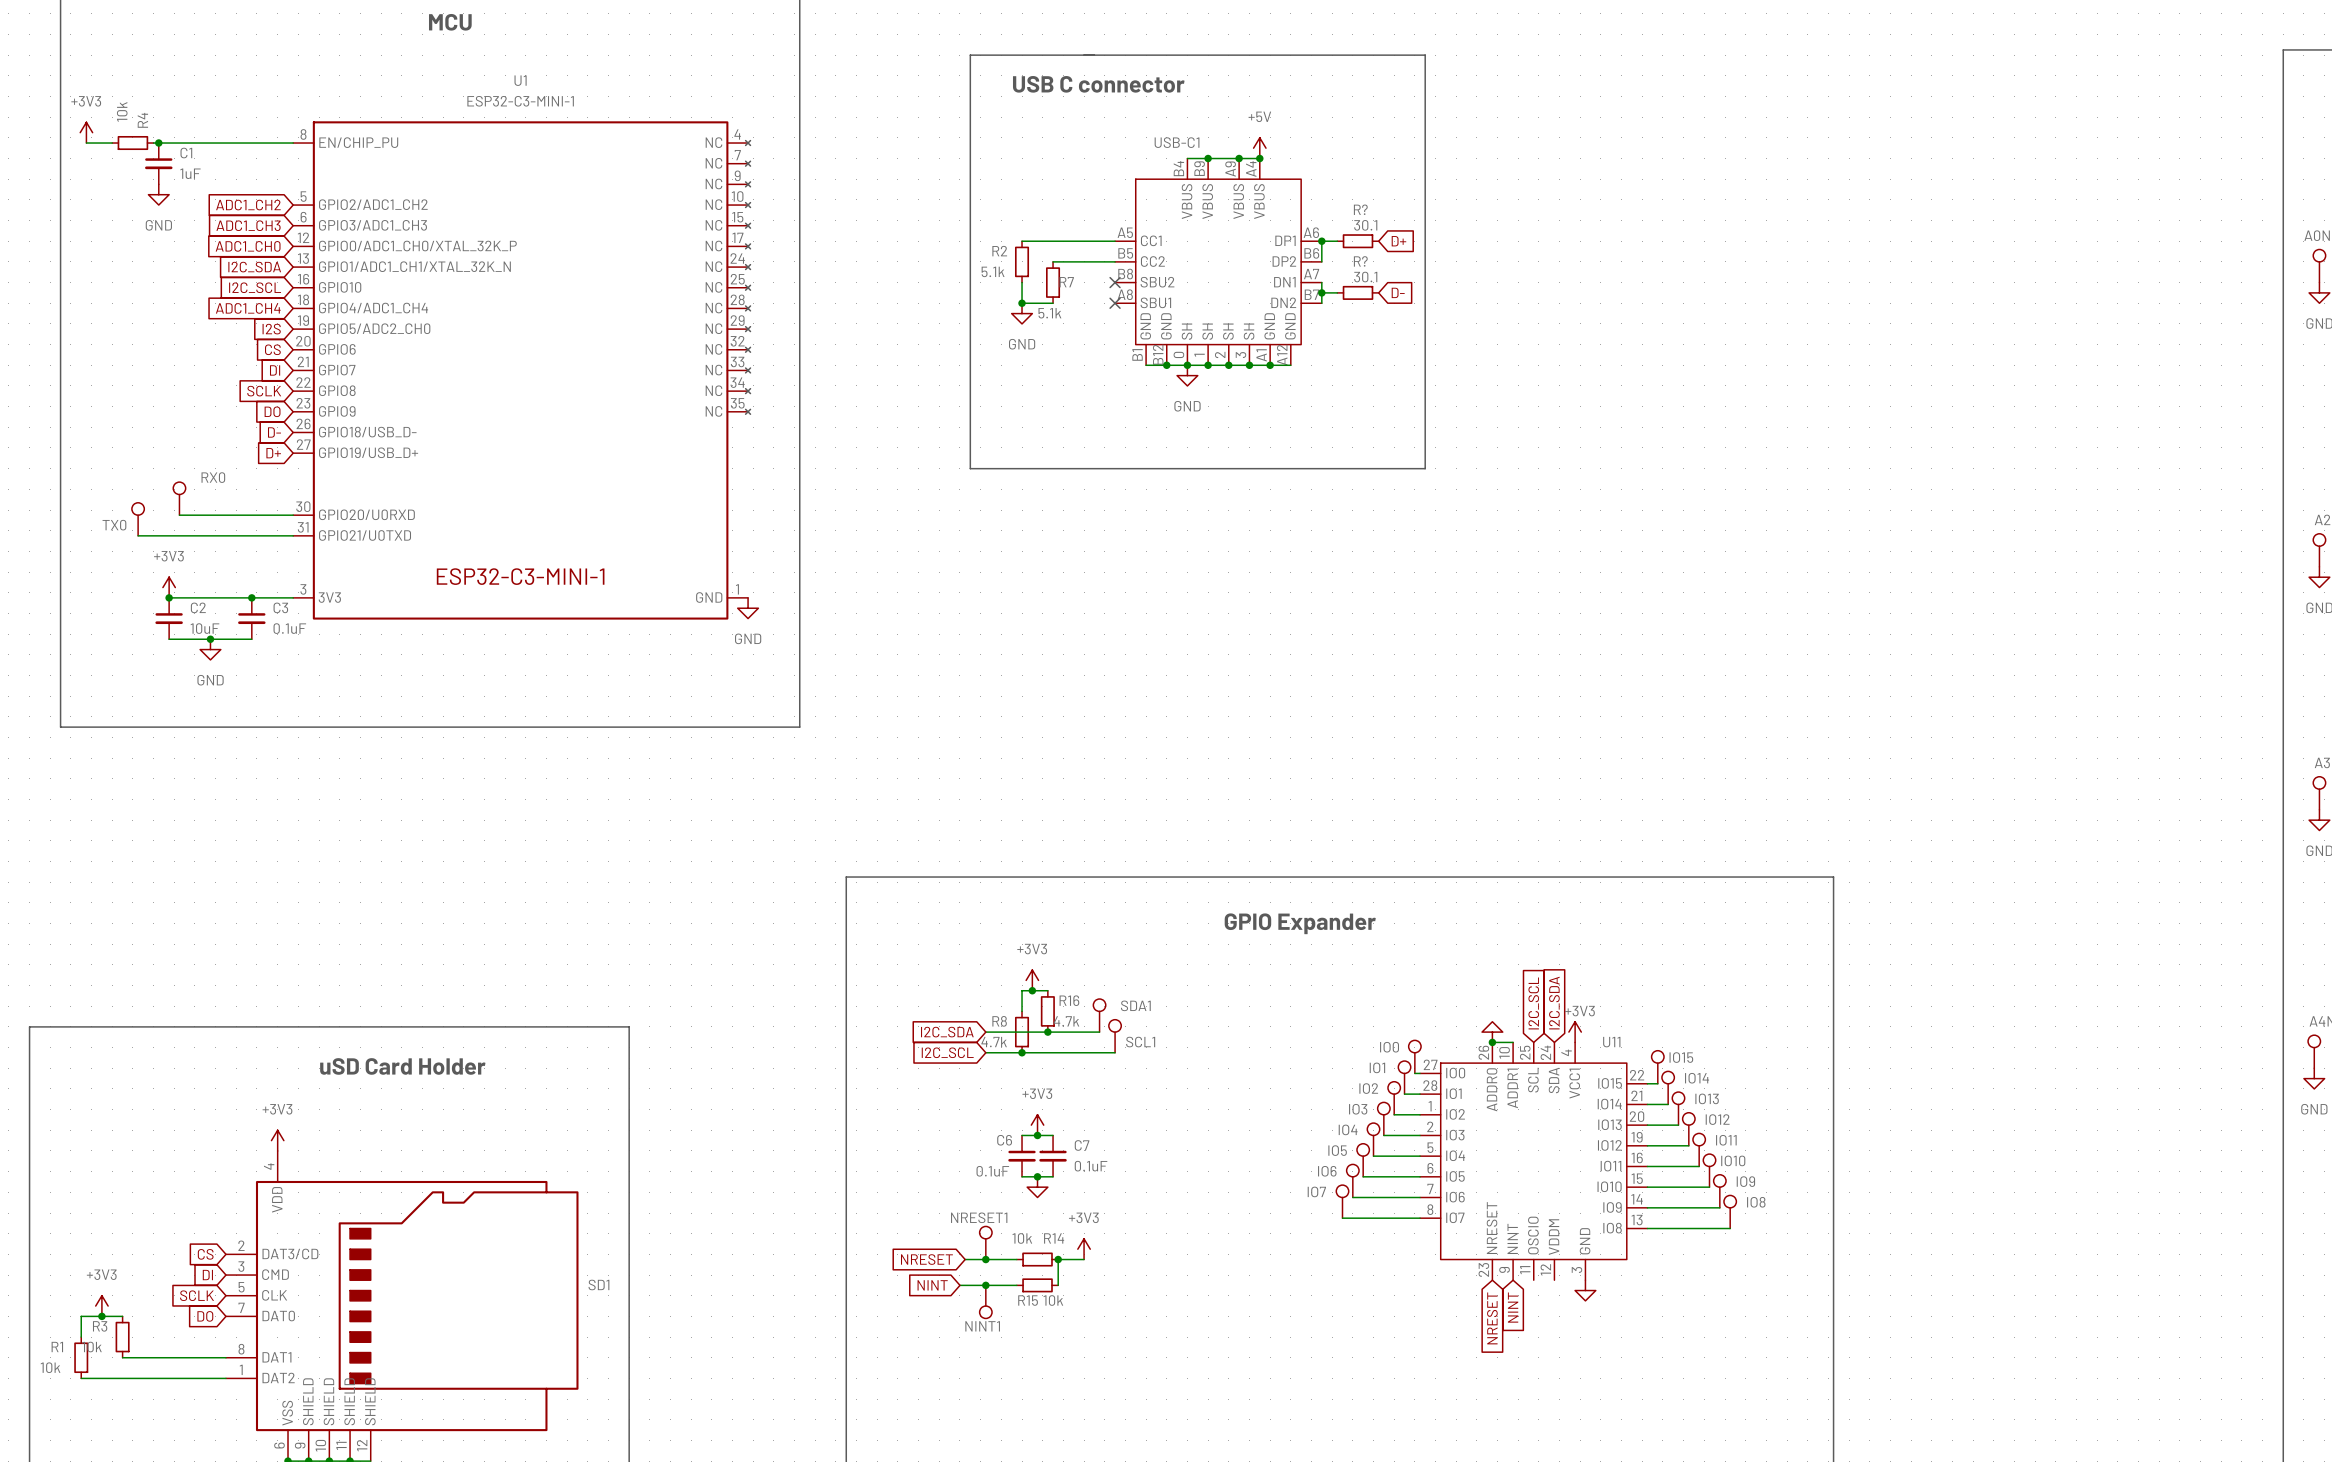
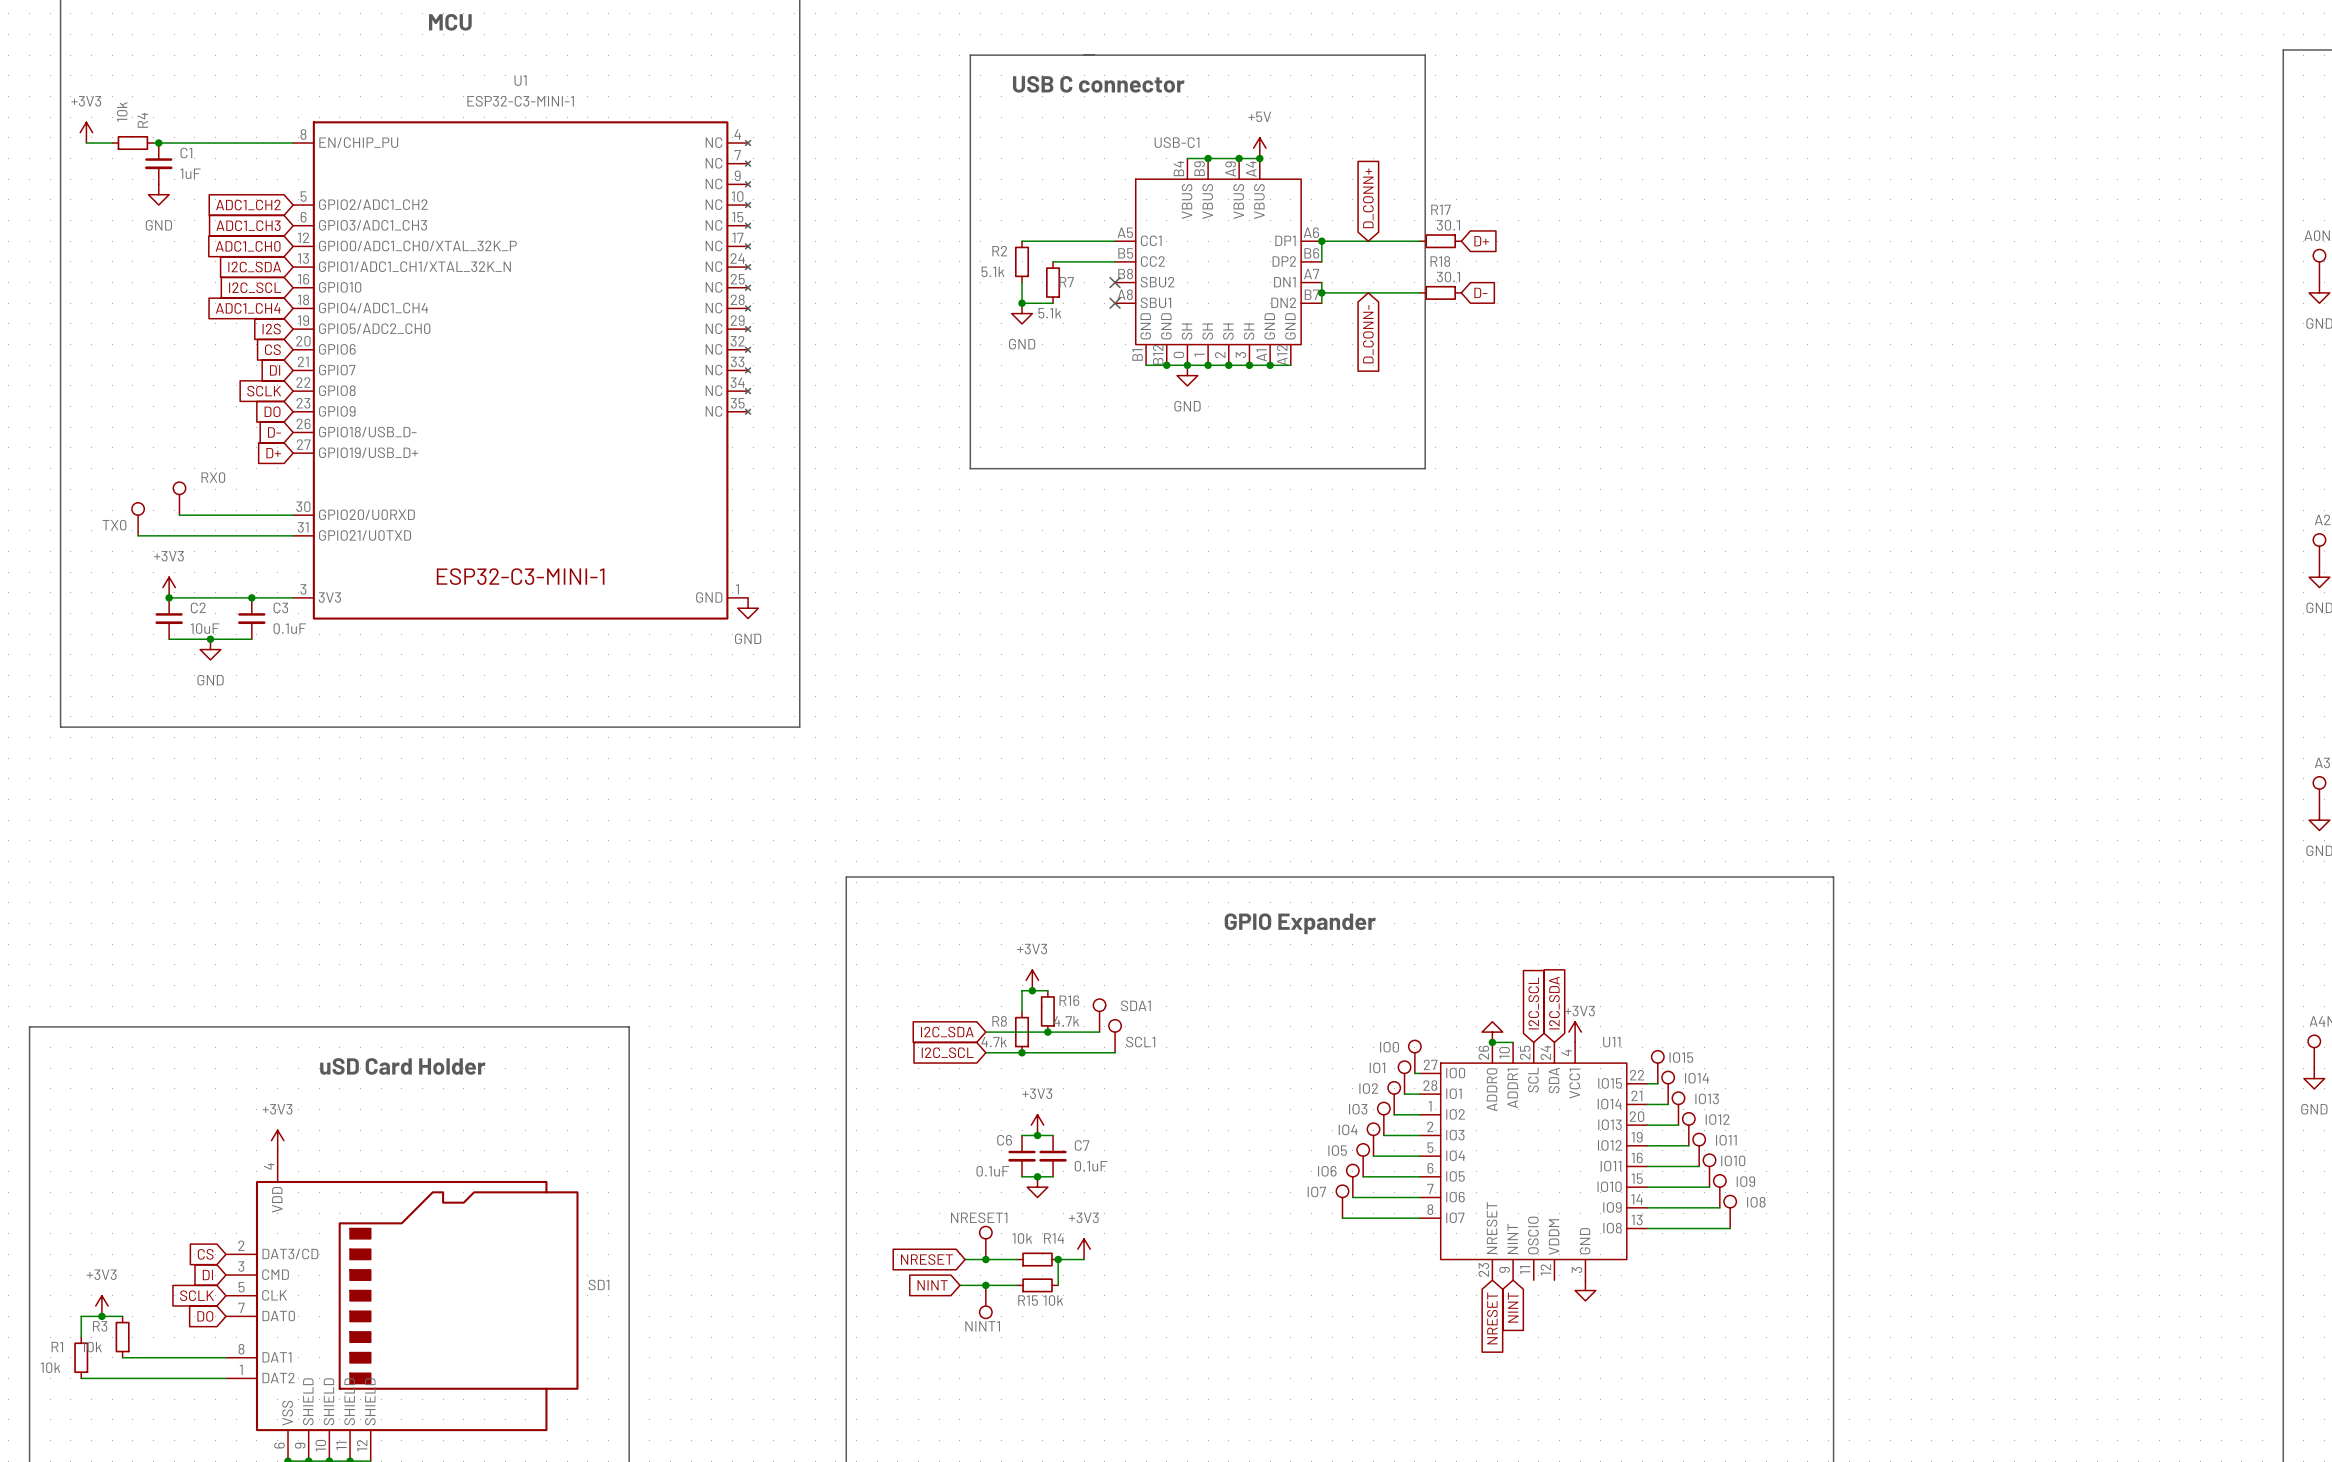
global label: none -> D_CONN+ (1368, 198)
wire: none -> (1337, 241) (1420, 241)
R?: 30.1 (1358, 241) -> none
global label position: D+ (1398, 241) -> D+ (1481, 241)
R17: none -> 30.1 (1440, 241)
wire: none -> (1337, 292) (1420, 292)
R?: 30.1 (1358, 292) -> none
global label position: D- (1398, 292) -> D- (1480, 292)
R18: none -> 30.1 (1440, 292)
global label: none -> D_CONN- (1368, 334)

